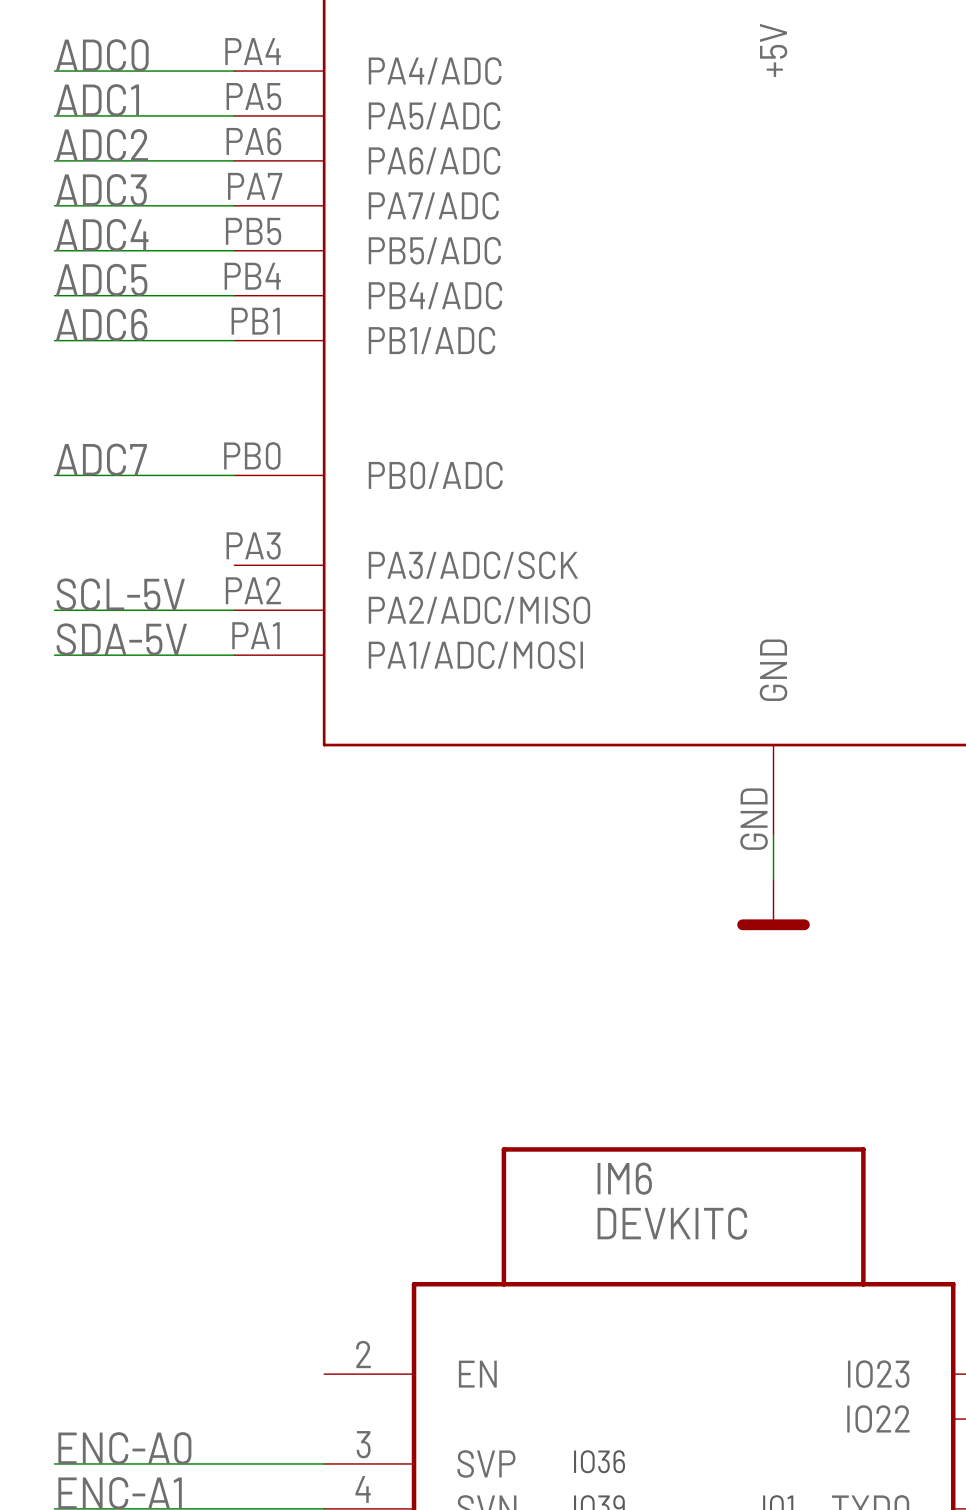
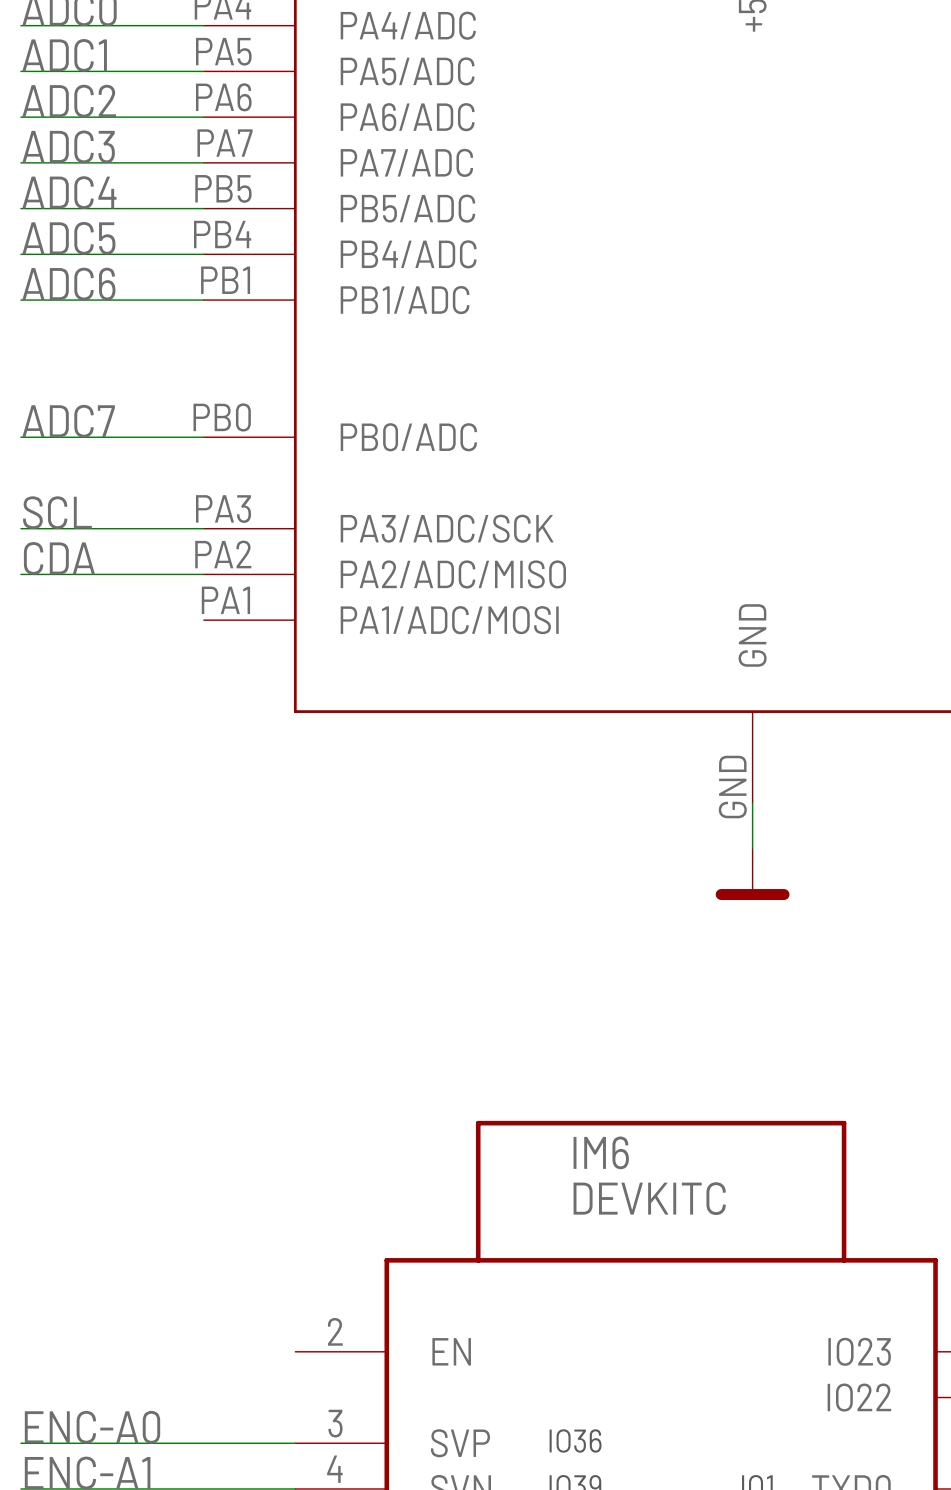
label: none -> SCL (57, 512)
label: SCL-5V (120, 594) -> CDA (59, 558)
label: SDA-5V (121, 639) -> none
wire: (54, 655) (234, 655) -> (20, 528) (203, 528)

